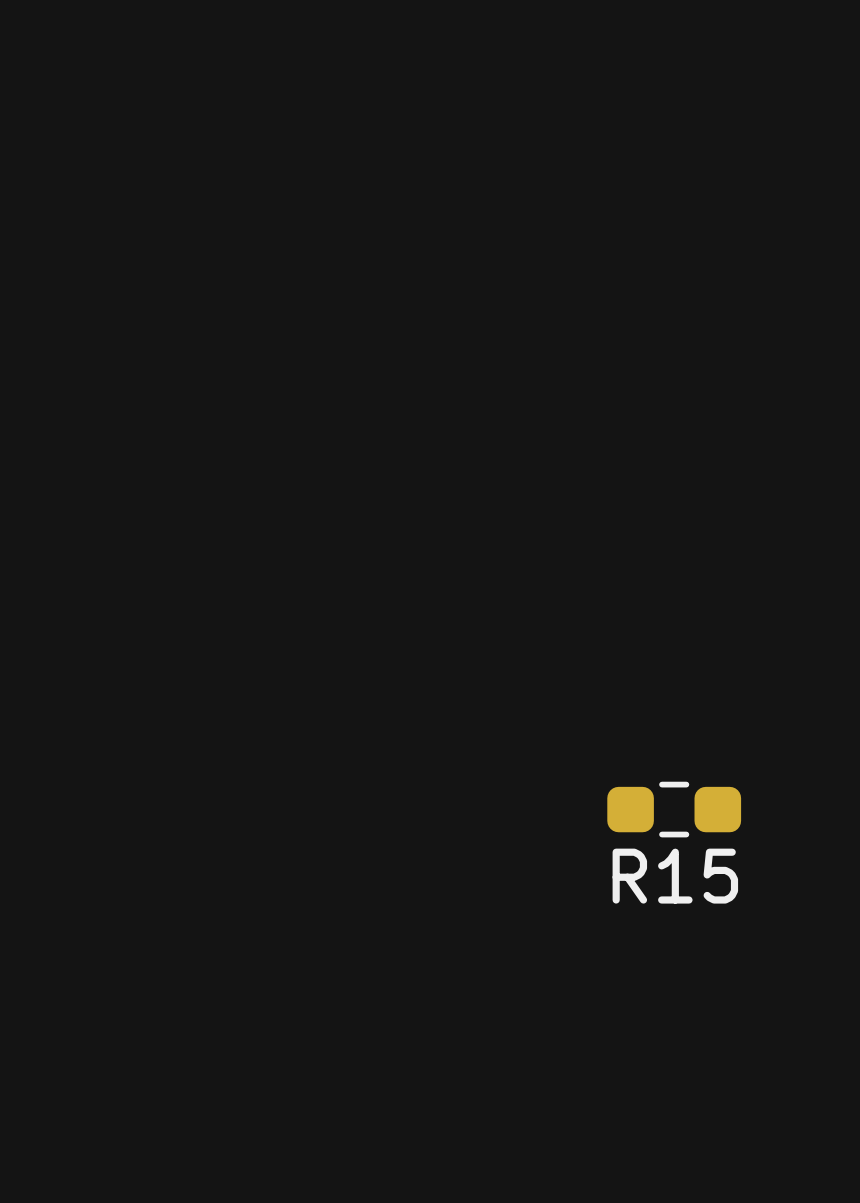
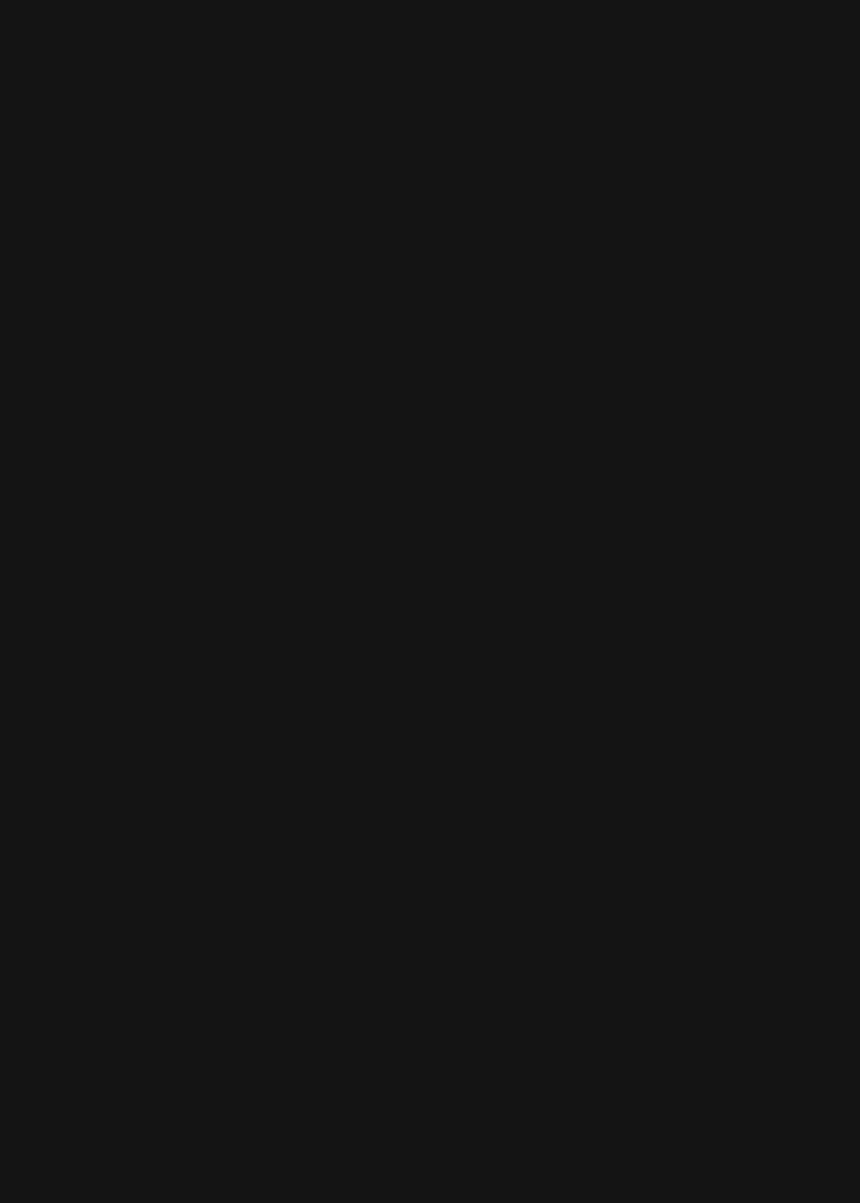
R15: (674, 809) -> none

